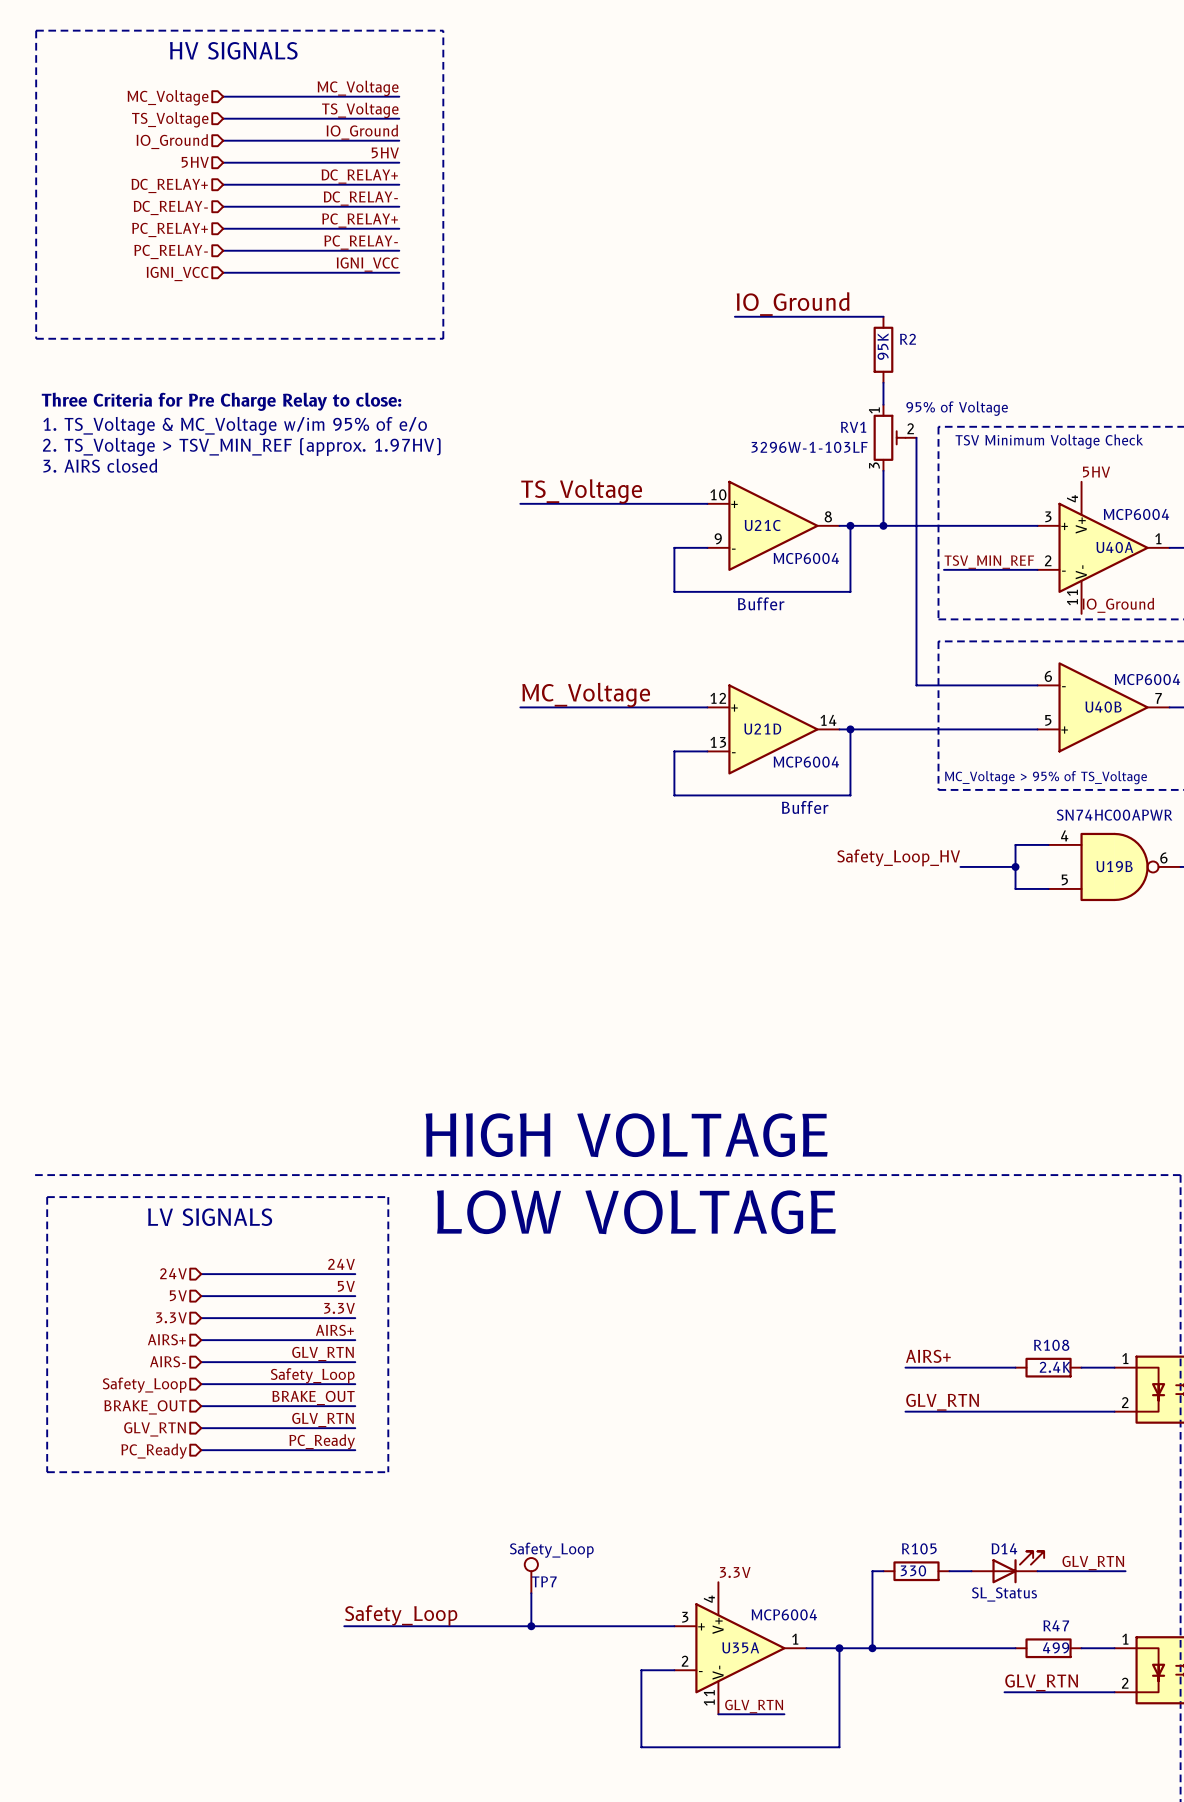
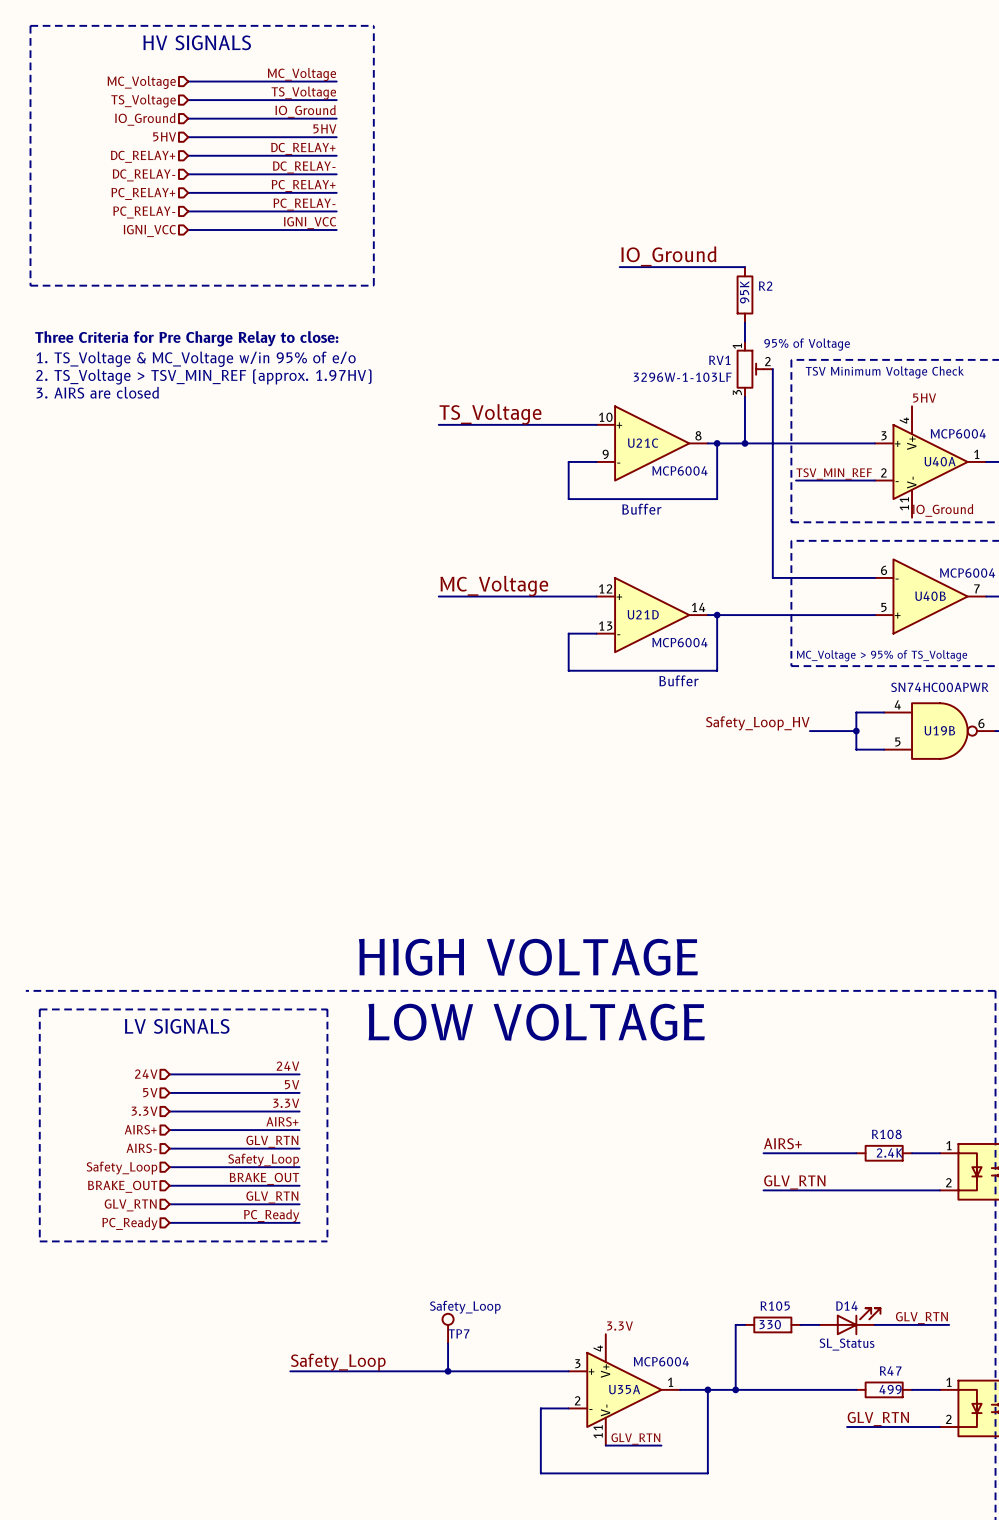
text: 1. TS_Voltage & MC_Voltage w/im 95% of e/o (235, 426) -> 1. TS_Voltage & MC_Voltage w/in 95% of e/o (196, 359)
text: 3. AIRS closed (100, 465) -> 3. AIRS are closed (97, 392)

